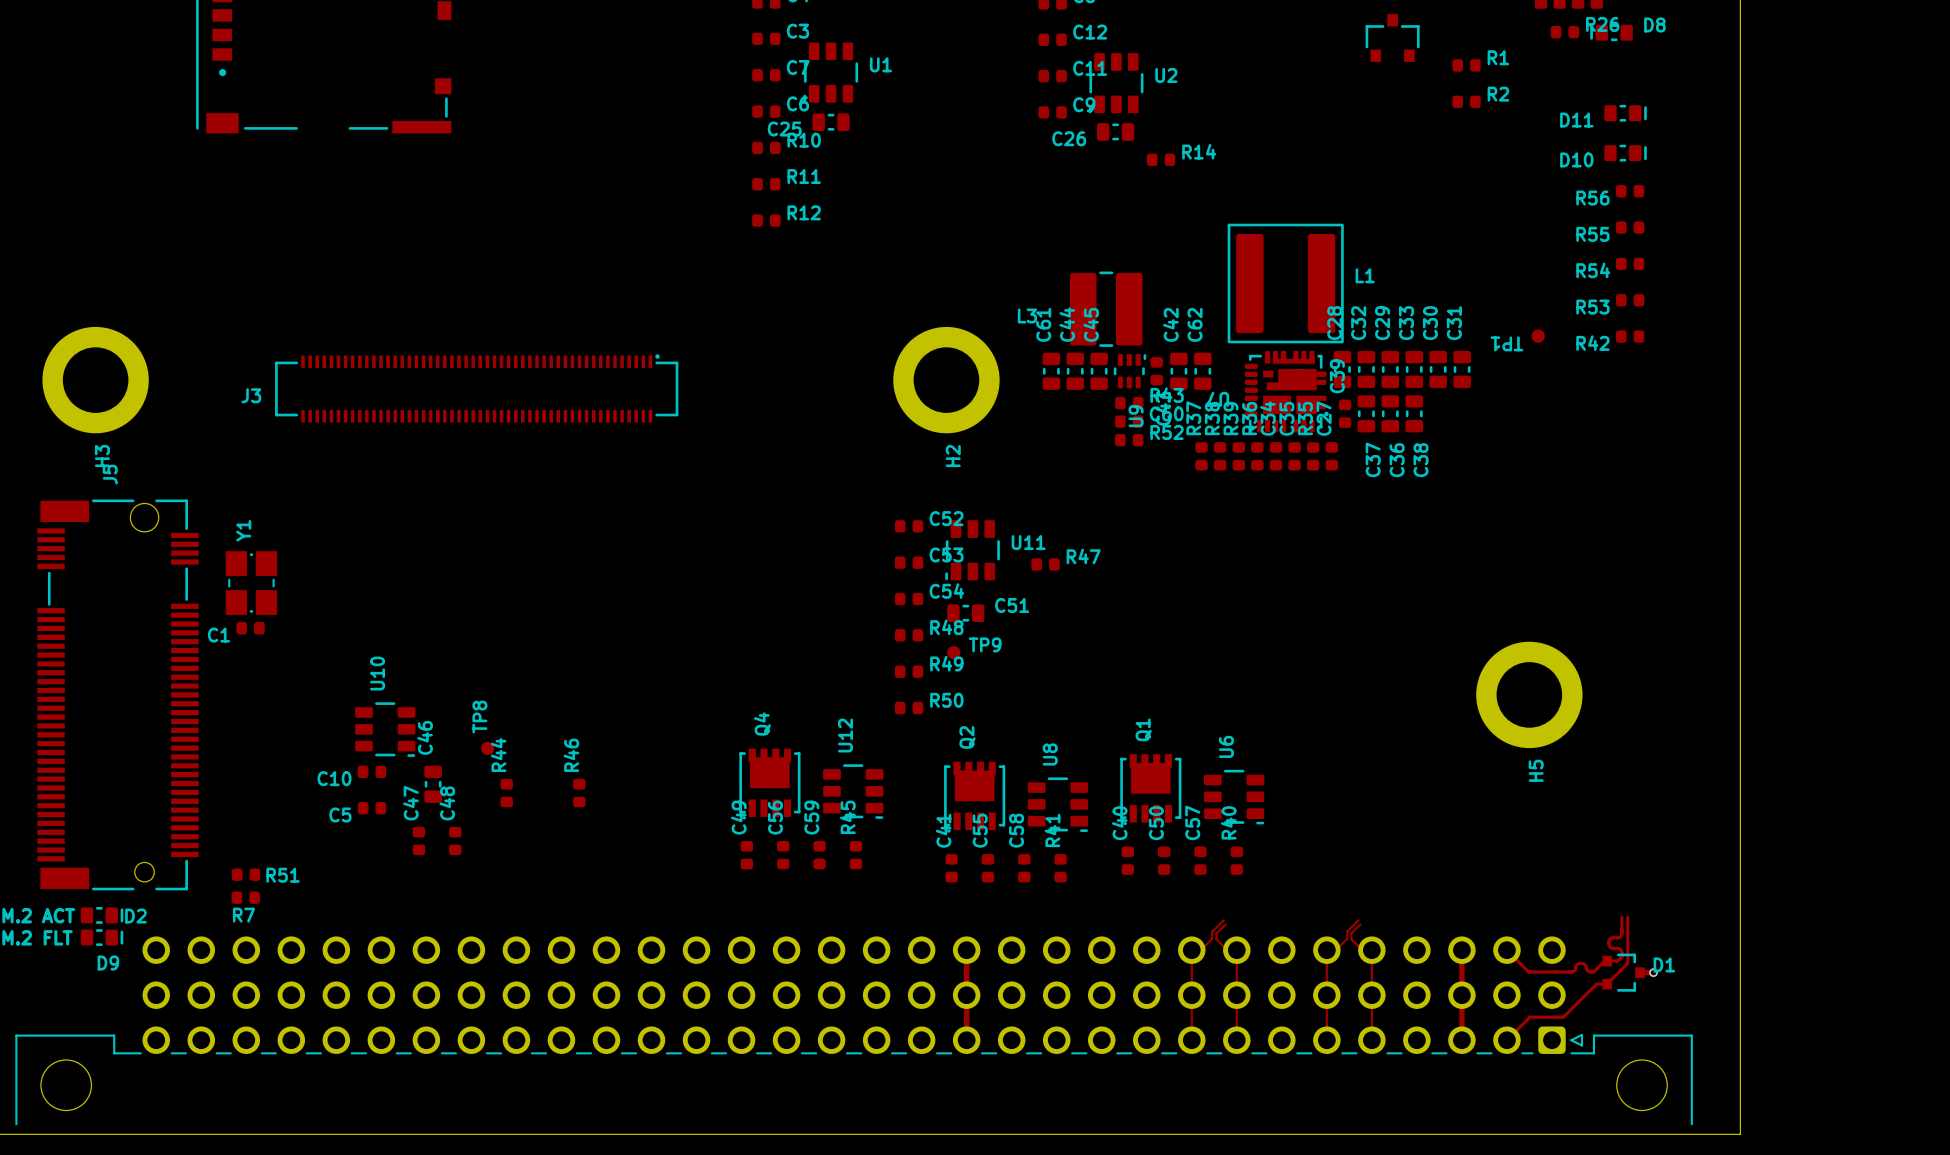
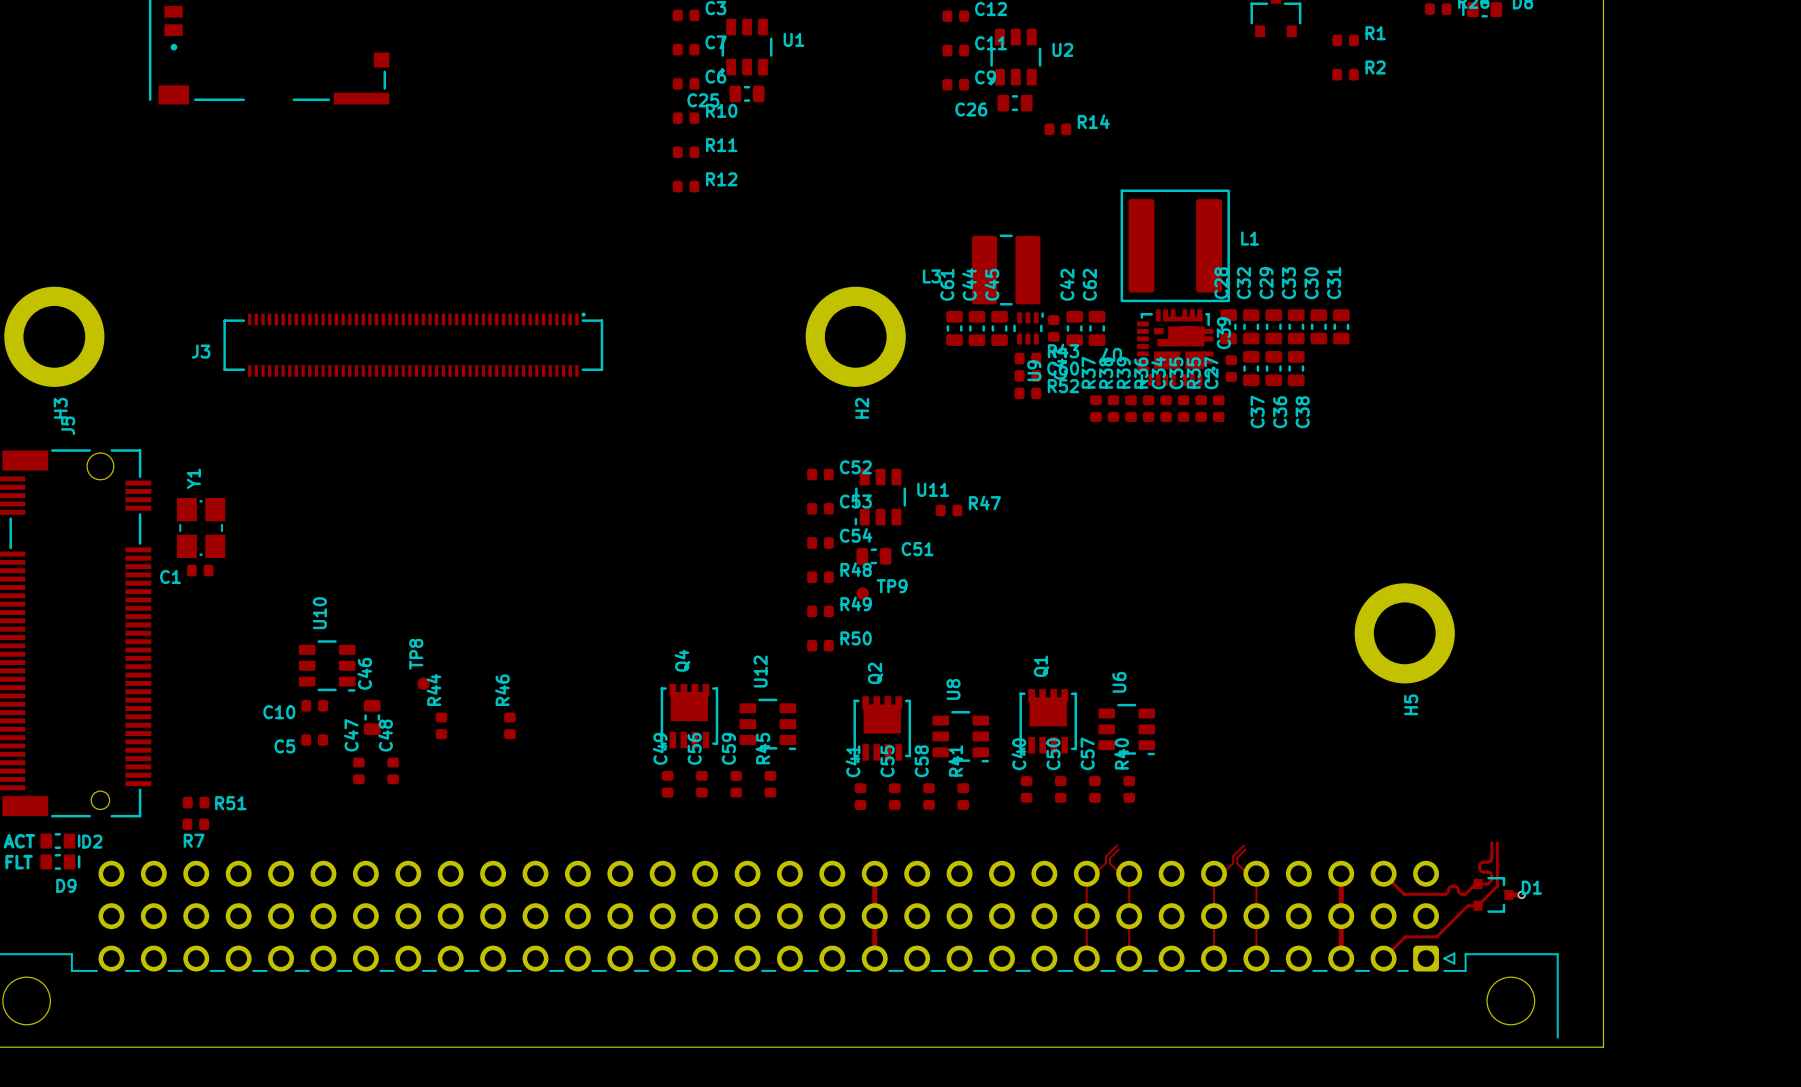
D11: (1625, 113) -> none
D10: (1625, 153) -> none
R56: (1630, 191) -> none
R55: (1630, 227) -> none
R54: (1630, 263) -> none
R53: (1630, 300) -> none
TP1: (1538, 336) -> none
R42: (1630, 336) -> none

